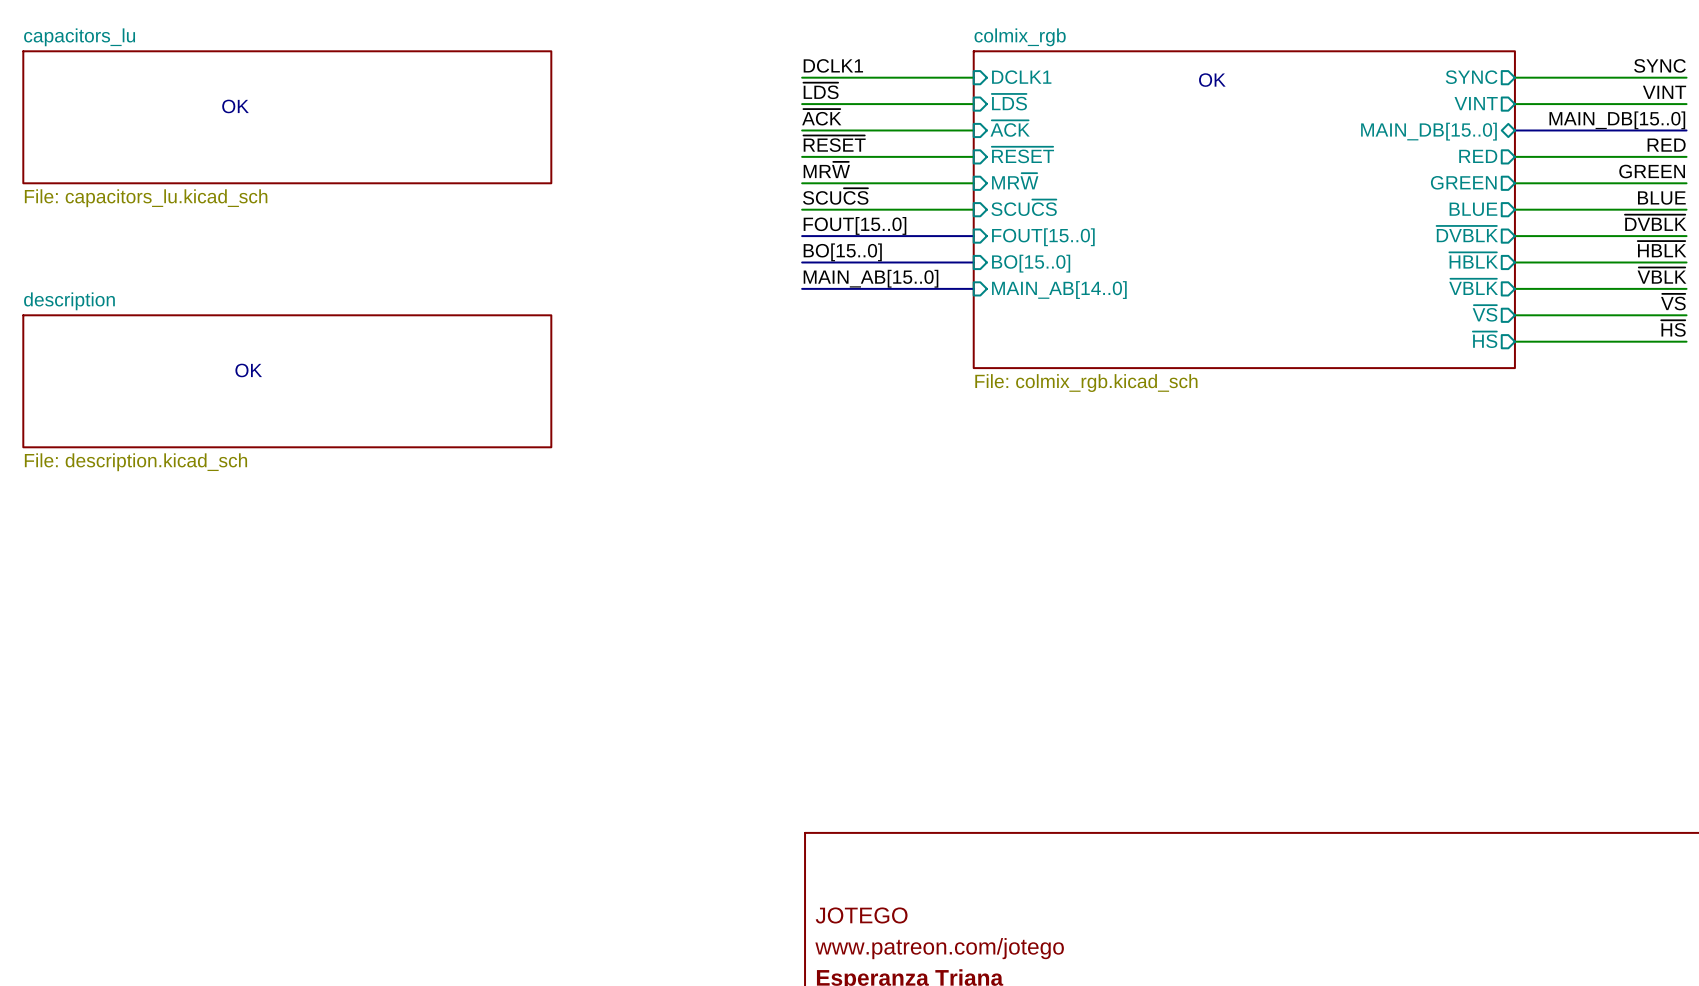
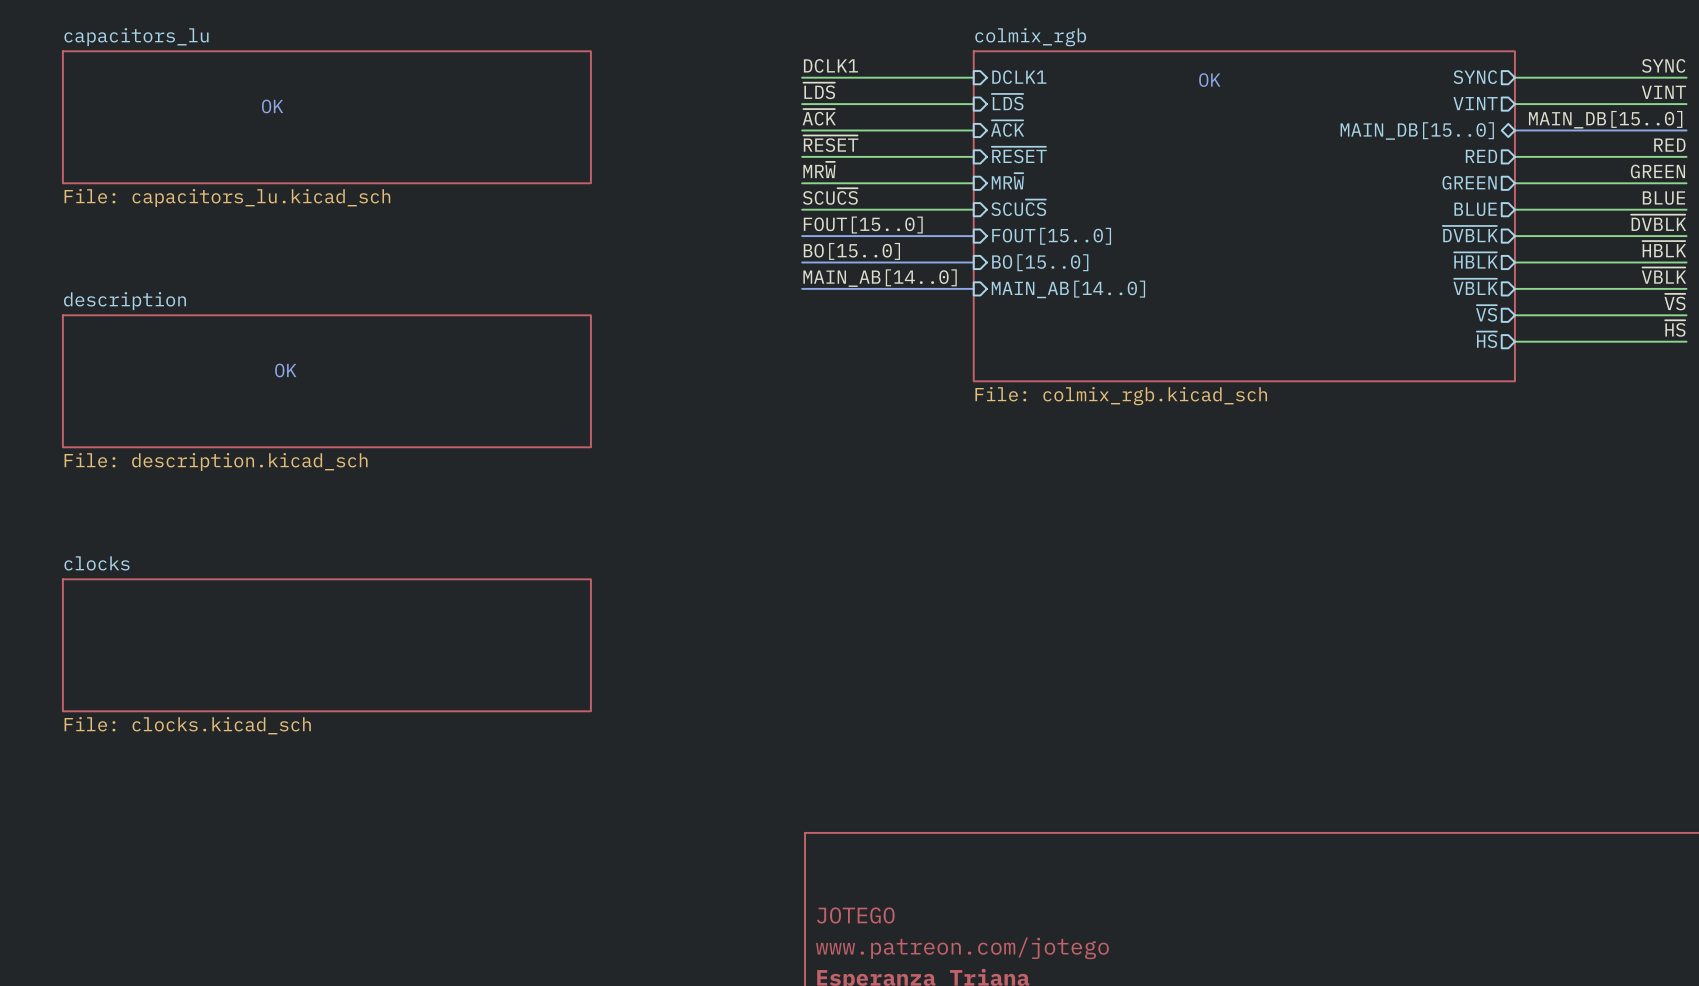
sheet colmix_rgb shape: [972, 50, 1516, 369] -> [972, 50, 1516, 383]
text position: OK (235, 106) -> OK (272, 106)
sheet capacitors_lu position: (287, 117) -> (326, 117)
label: MAIN_AB[15..0] (871, 278) -> MAIN_AB[14..0] (880, 278)
text position: OK (248, 370) -> OK (285, 370)
sheet description position: (287, 381) -> (326, 381)
sheet clocks: none -> File: clocks.kicad_sch (326, 645)

